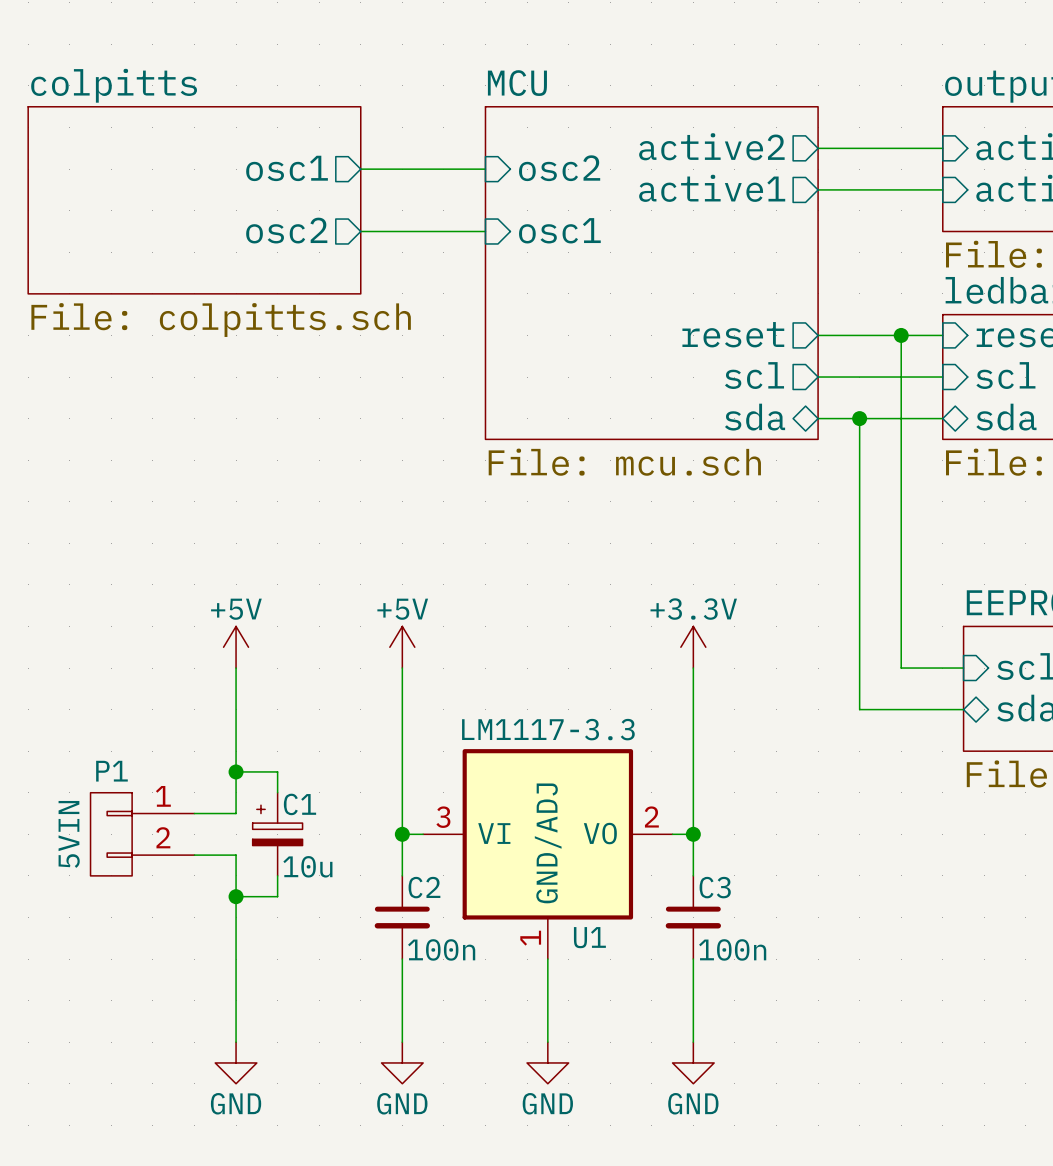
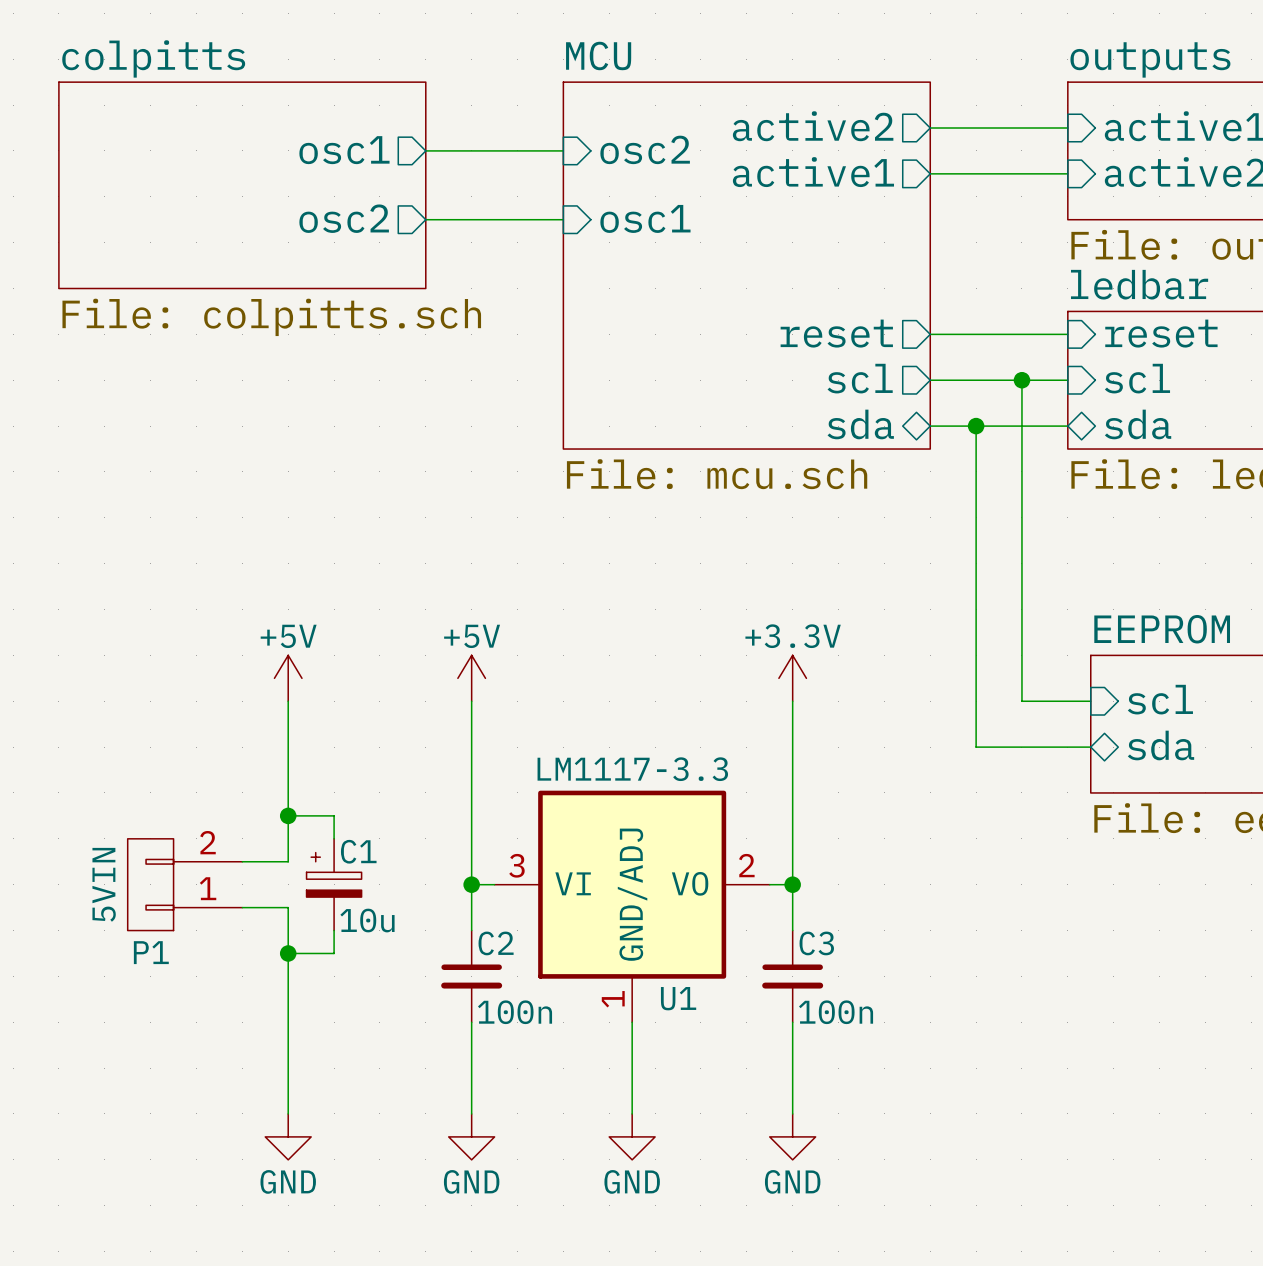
wire: (901, 335) (901, 377) -> none
junction position: (901, 335) -> (1021, 380)
P1 flip: as is (111, 834) -> up-down (150, 884)

